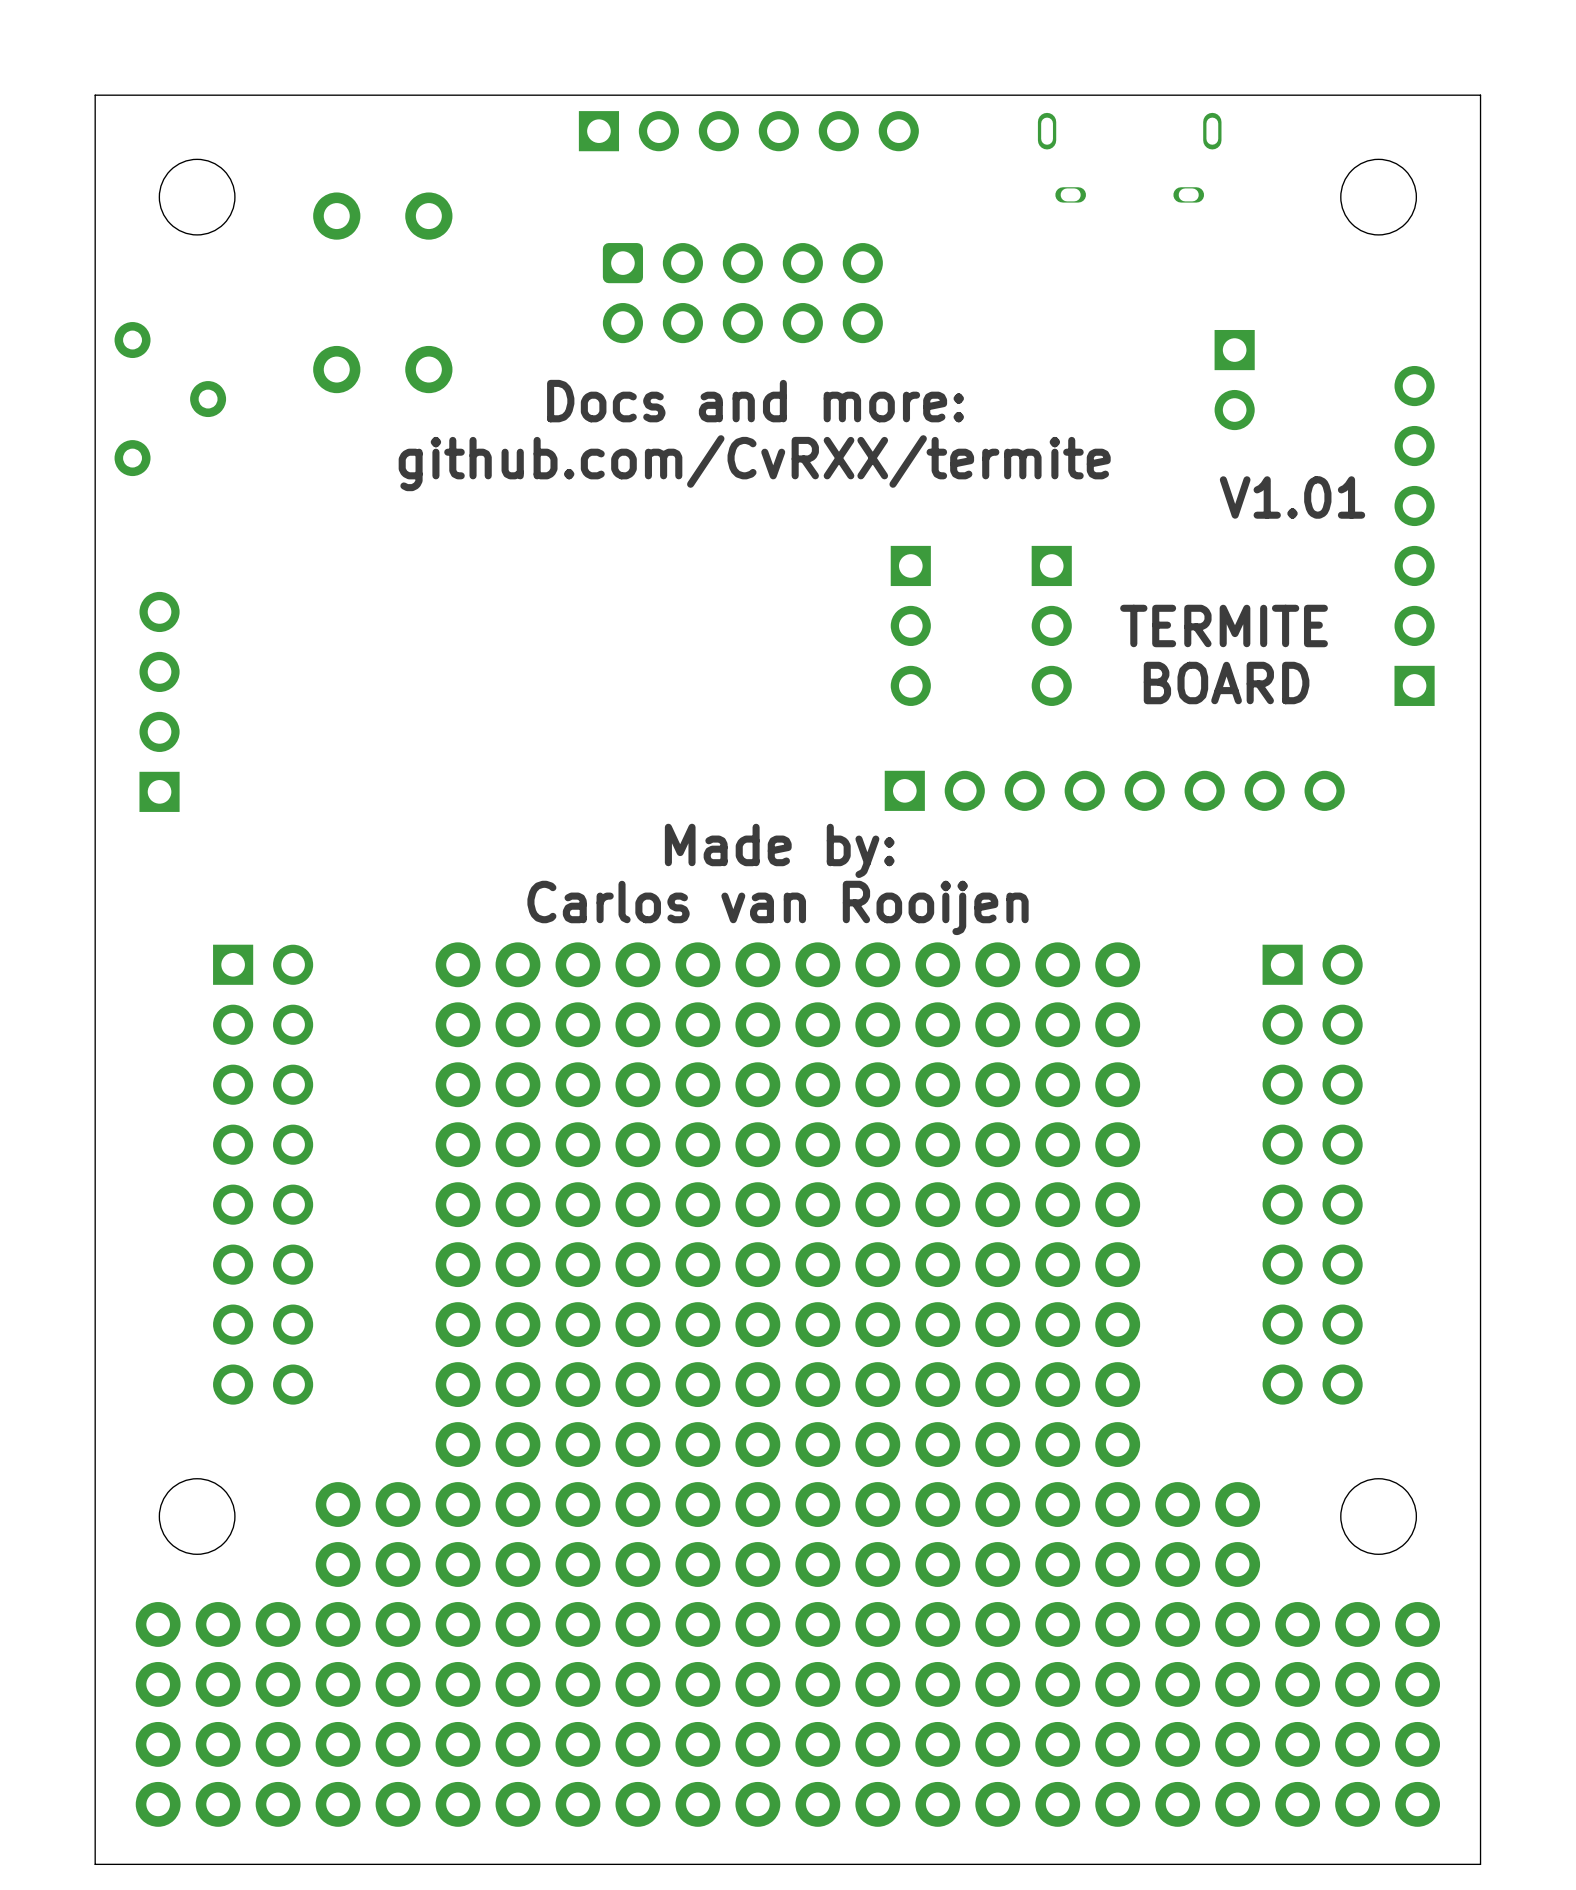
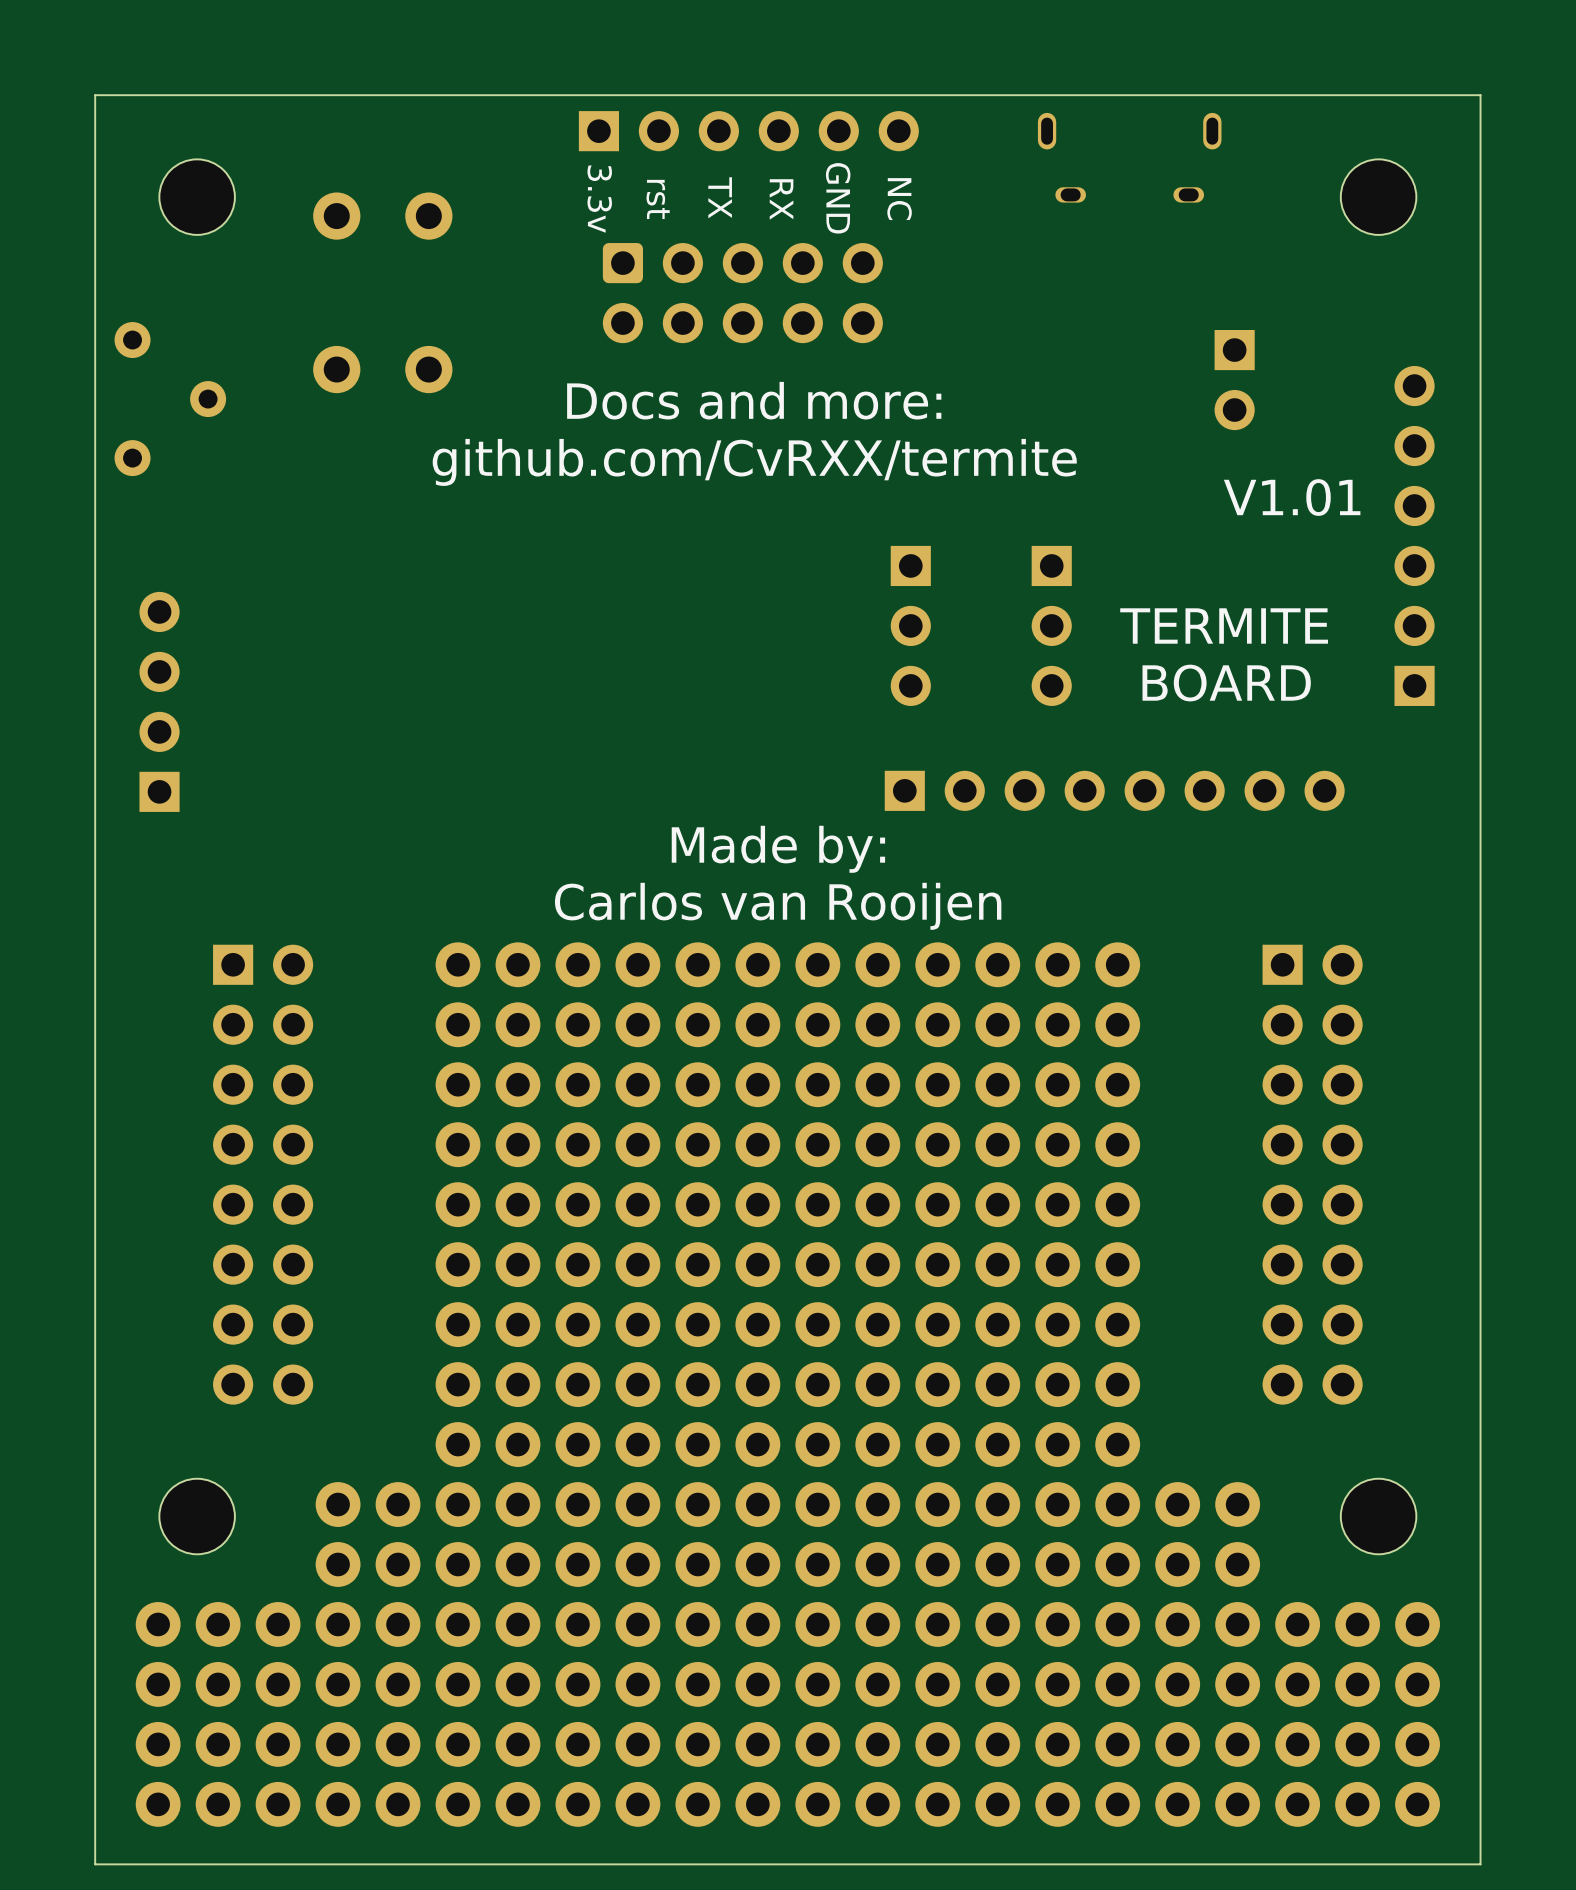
text: none -> TX (720, 197)
text: none -> 3.3v (599, 199)
text: none -> GND (838, 198)
text: none -> NC (899, 199)
text: none -> RX (781, 199)
text: none -> rst (658, 199)

